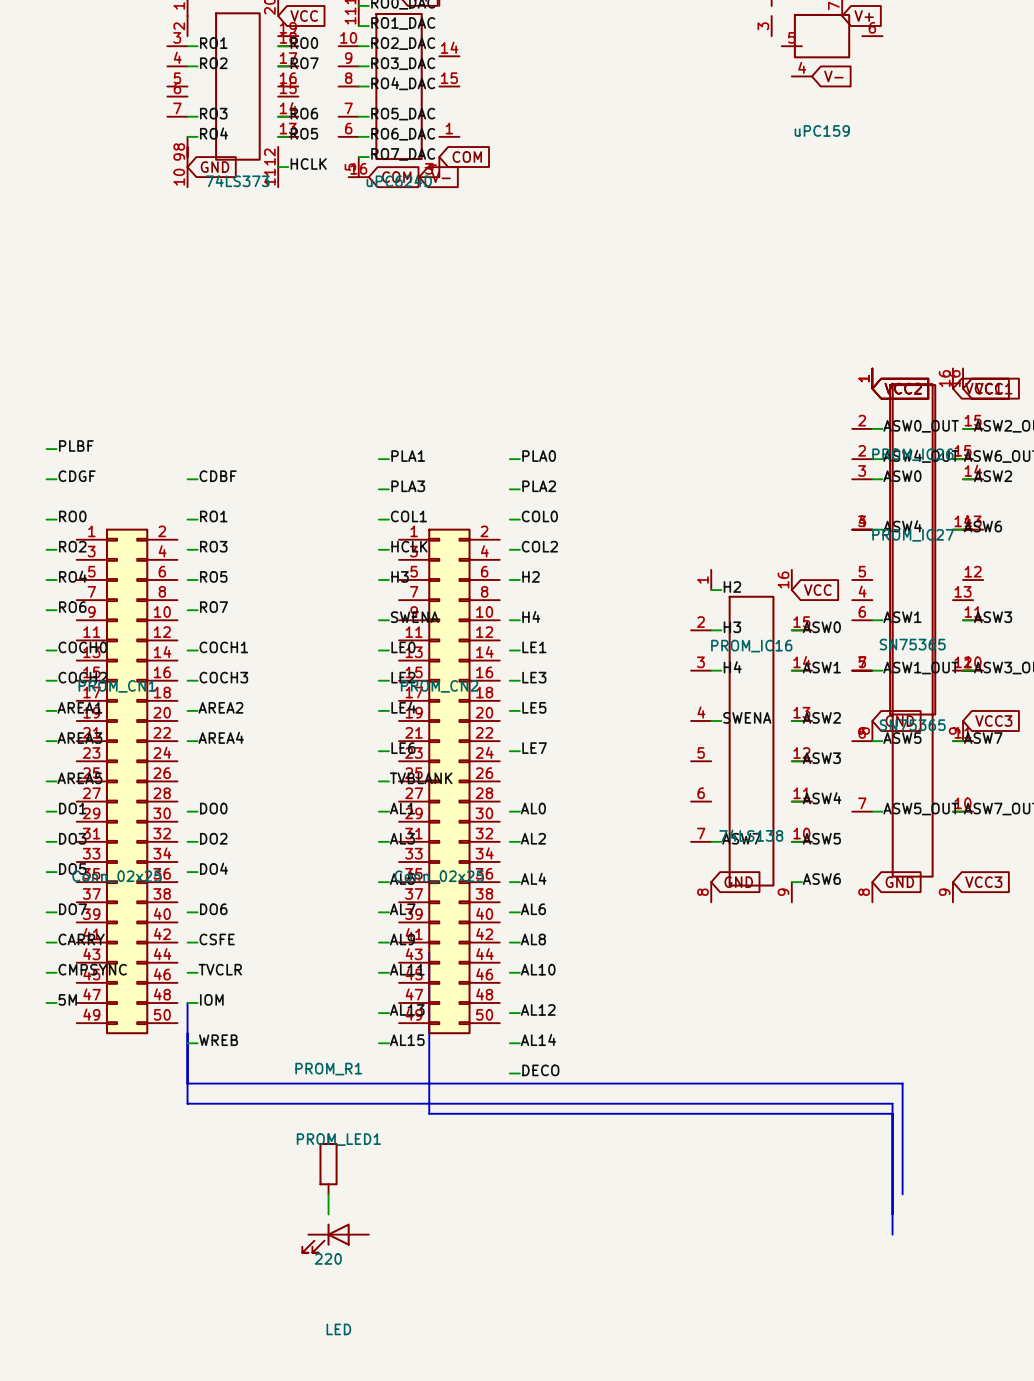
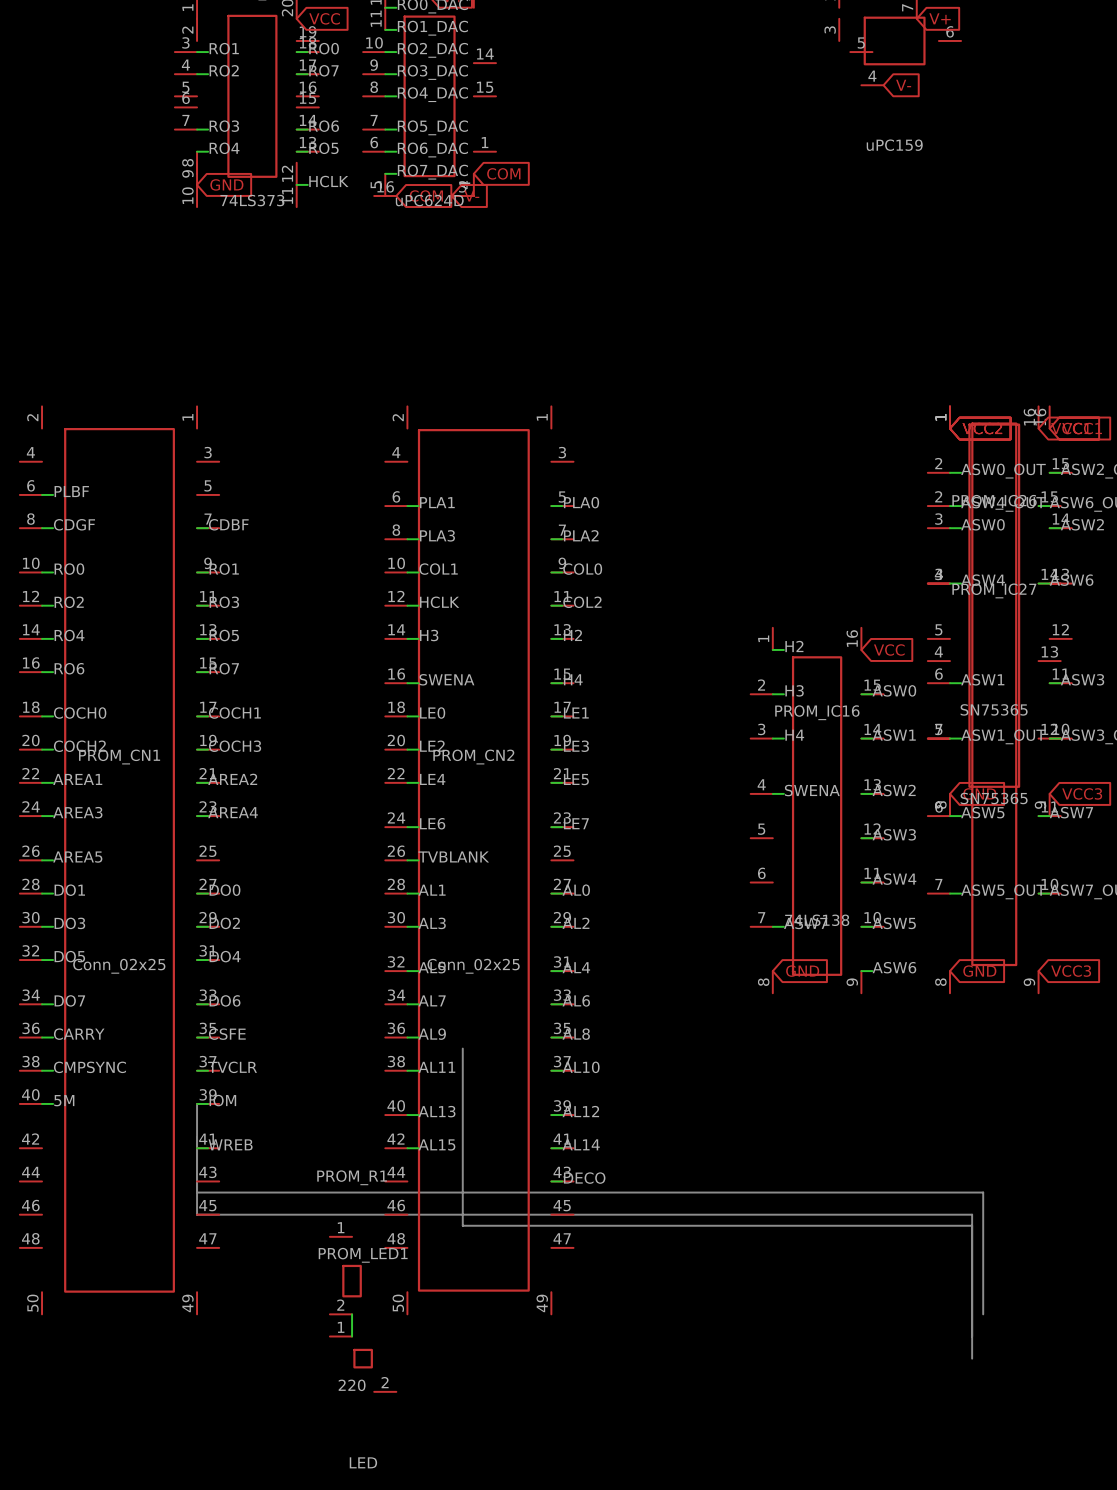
PROM_CN1 symbol: [76, 528, 178, 1035] -> [19, 406, 220, 1315]
PROM_CN2 symbol: [399, 528, 500, 1035] -> [385, 406, 574, 1315]
PROM_R1 symbol: [319, 1133, 338, 1195] -> [329, 1236, 362, 1315]
PROM_LED1 symbol: [302, 1223, 369, 1253] -> [329, 1336, 397, 1392]

